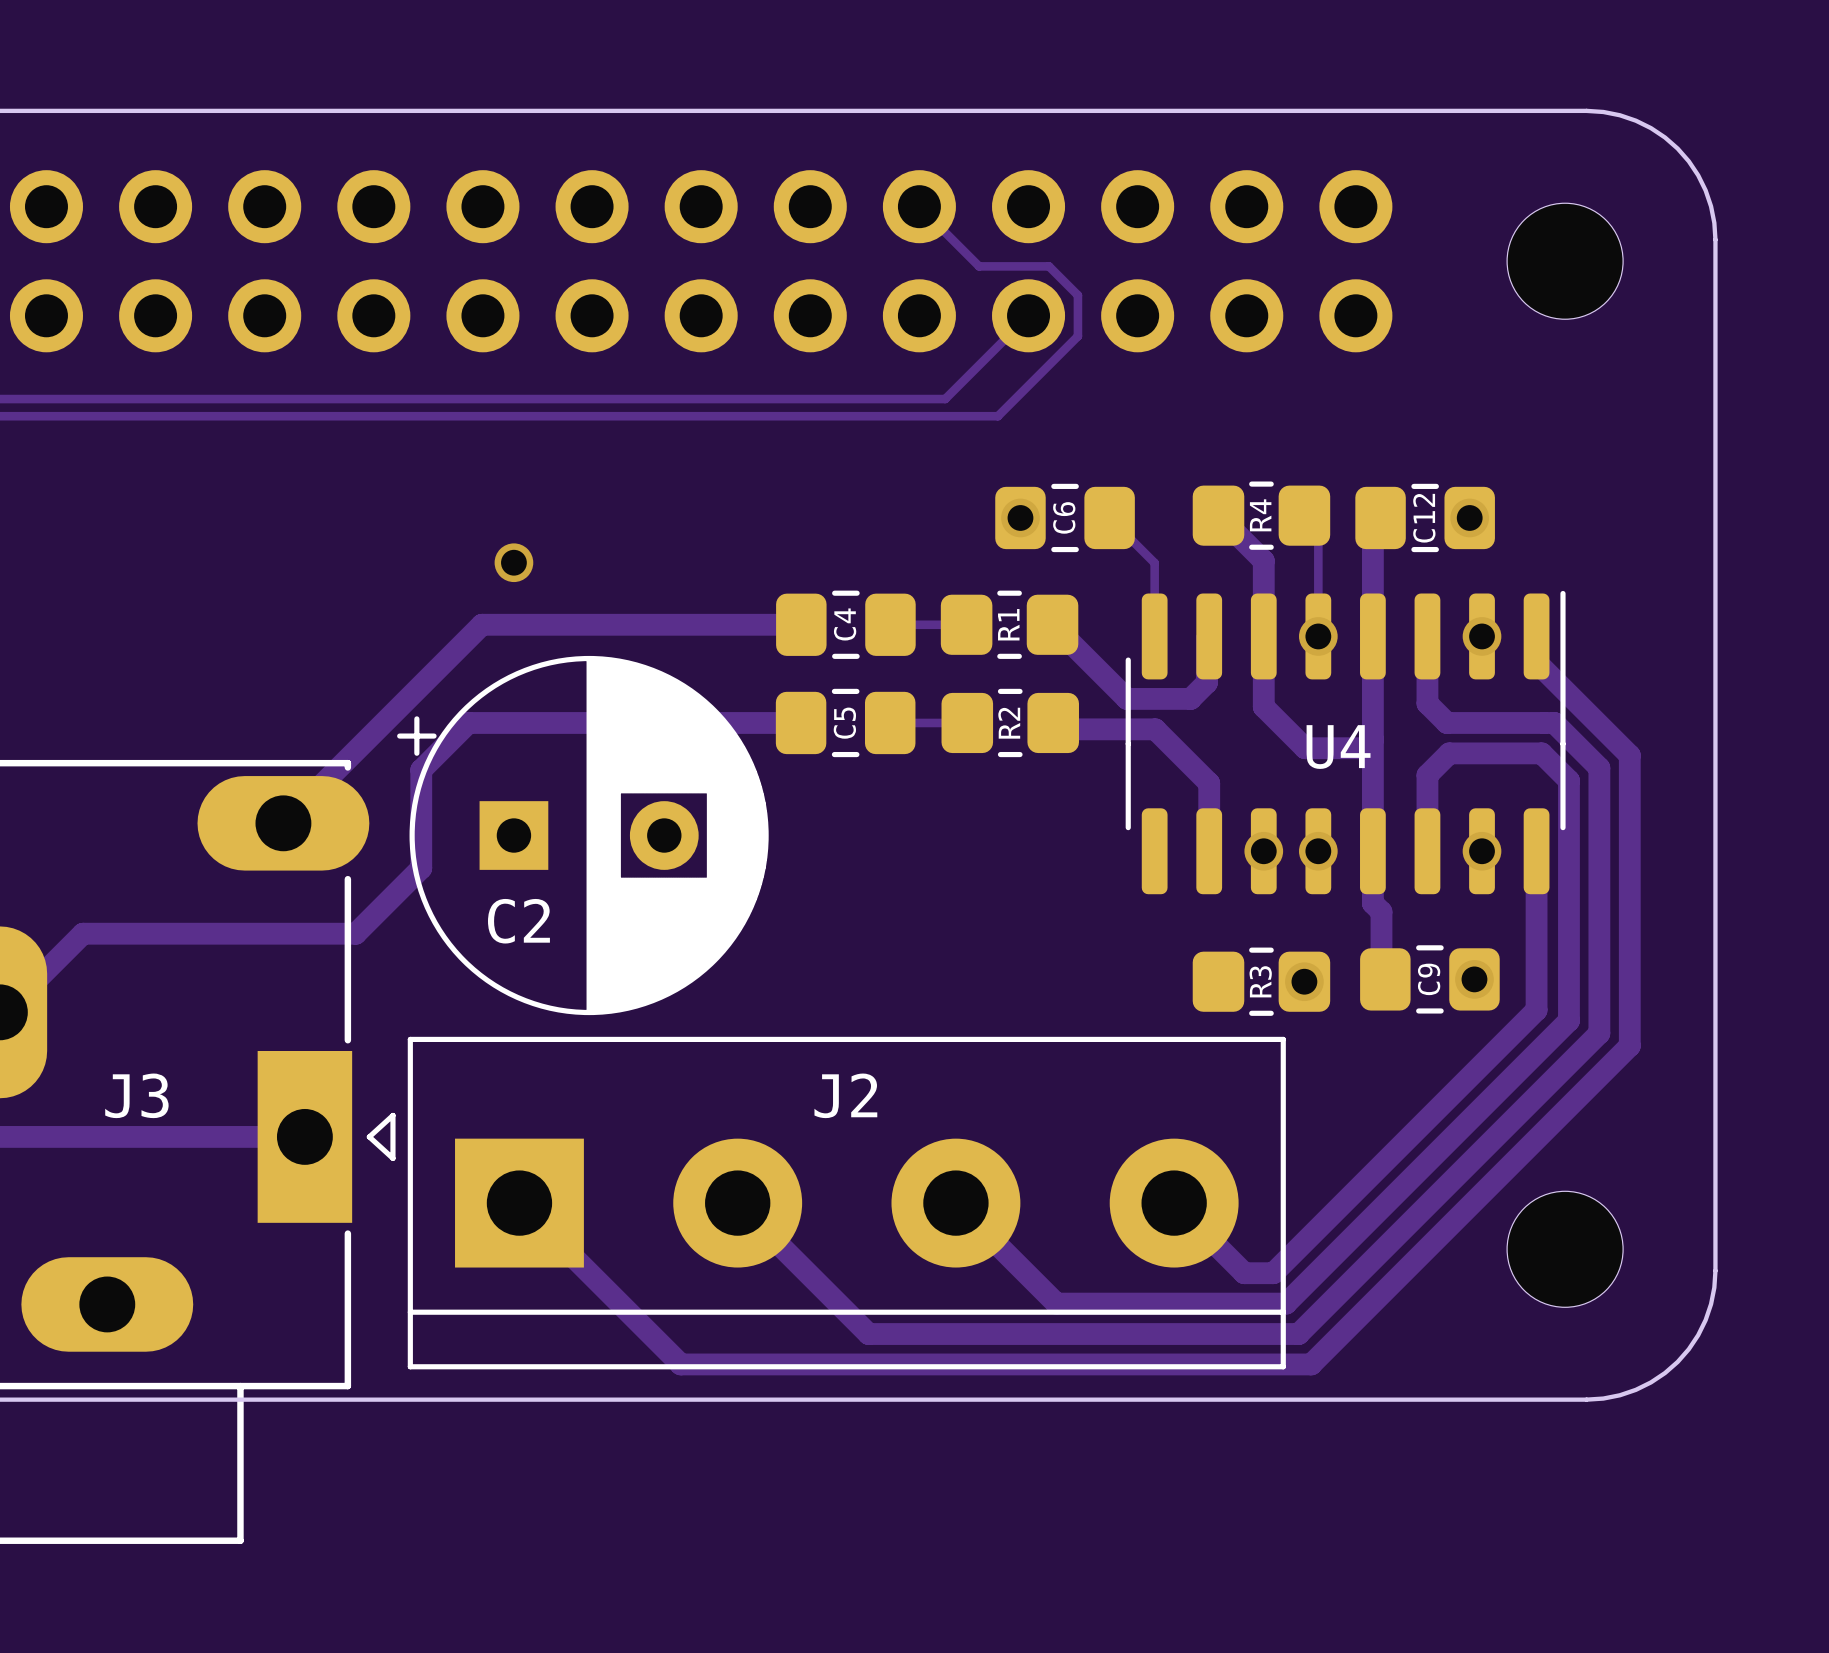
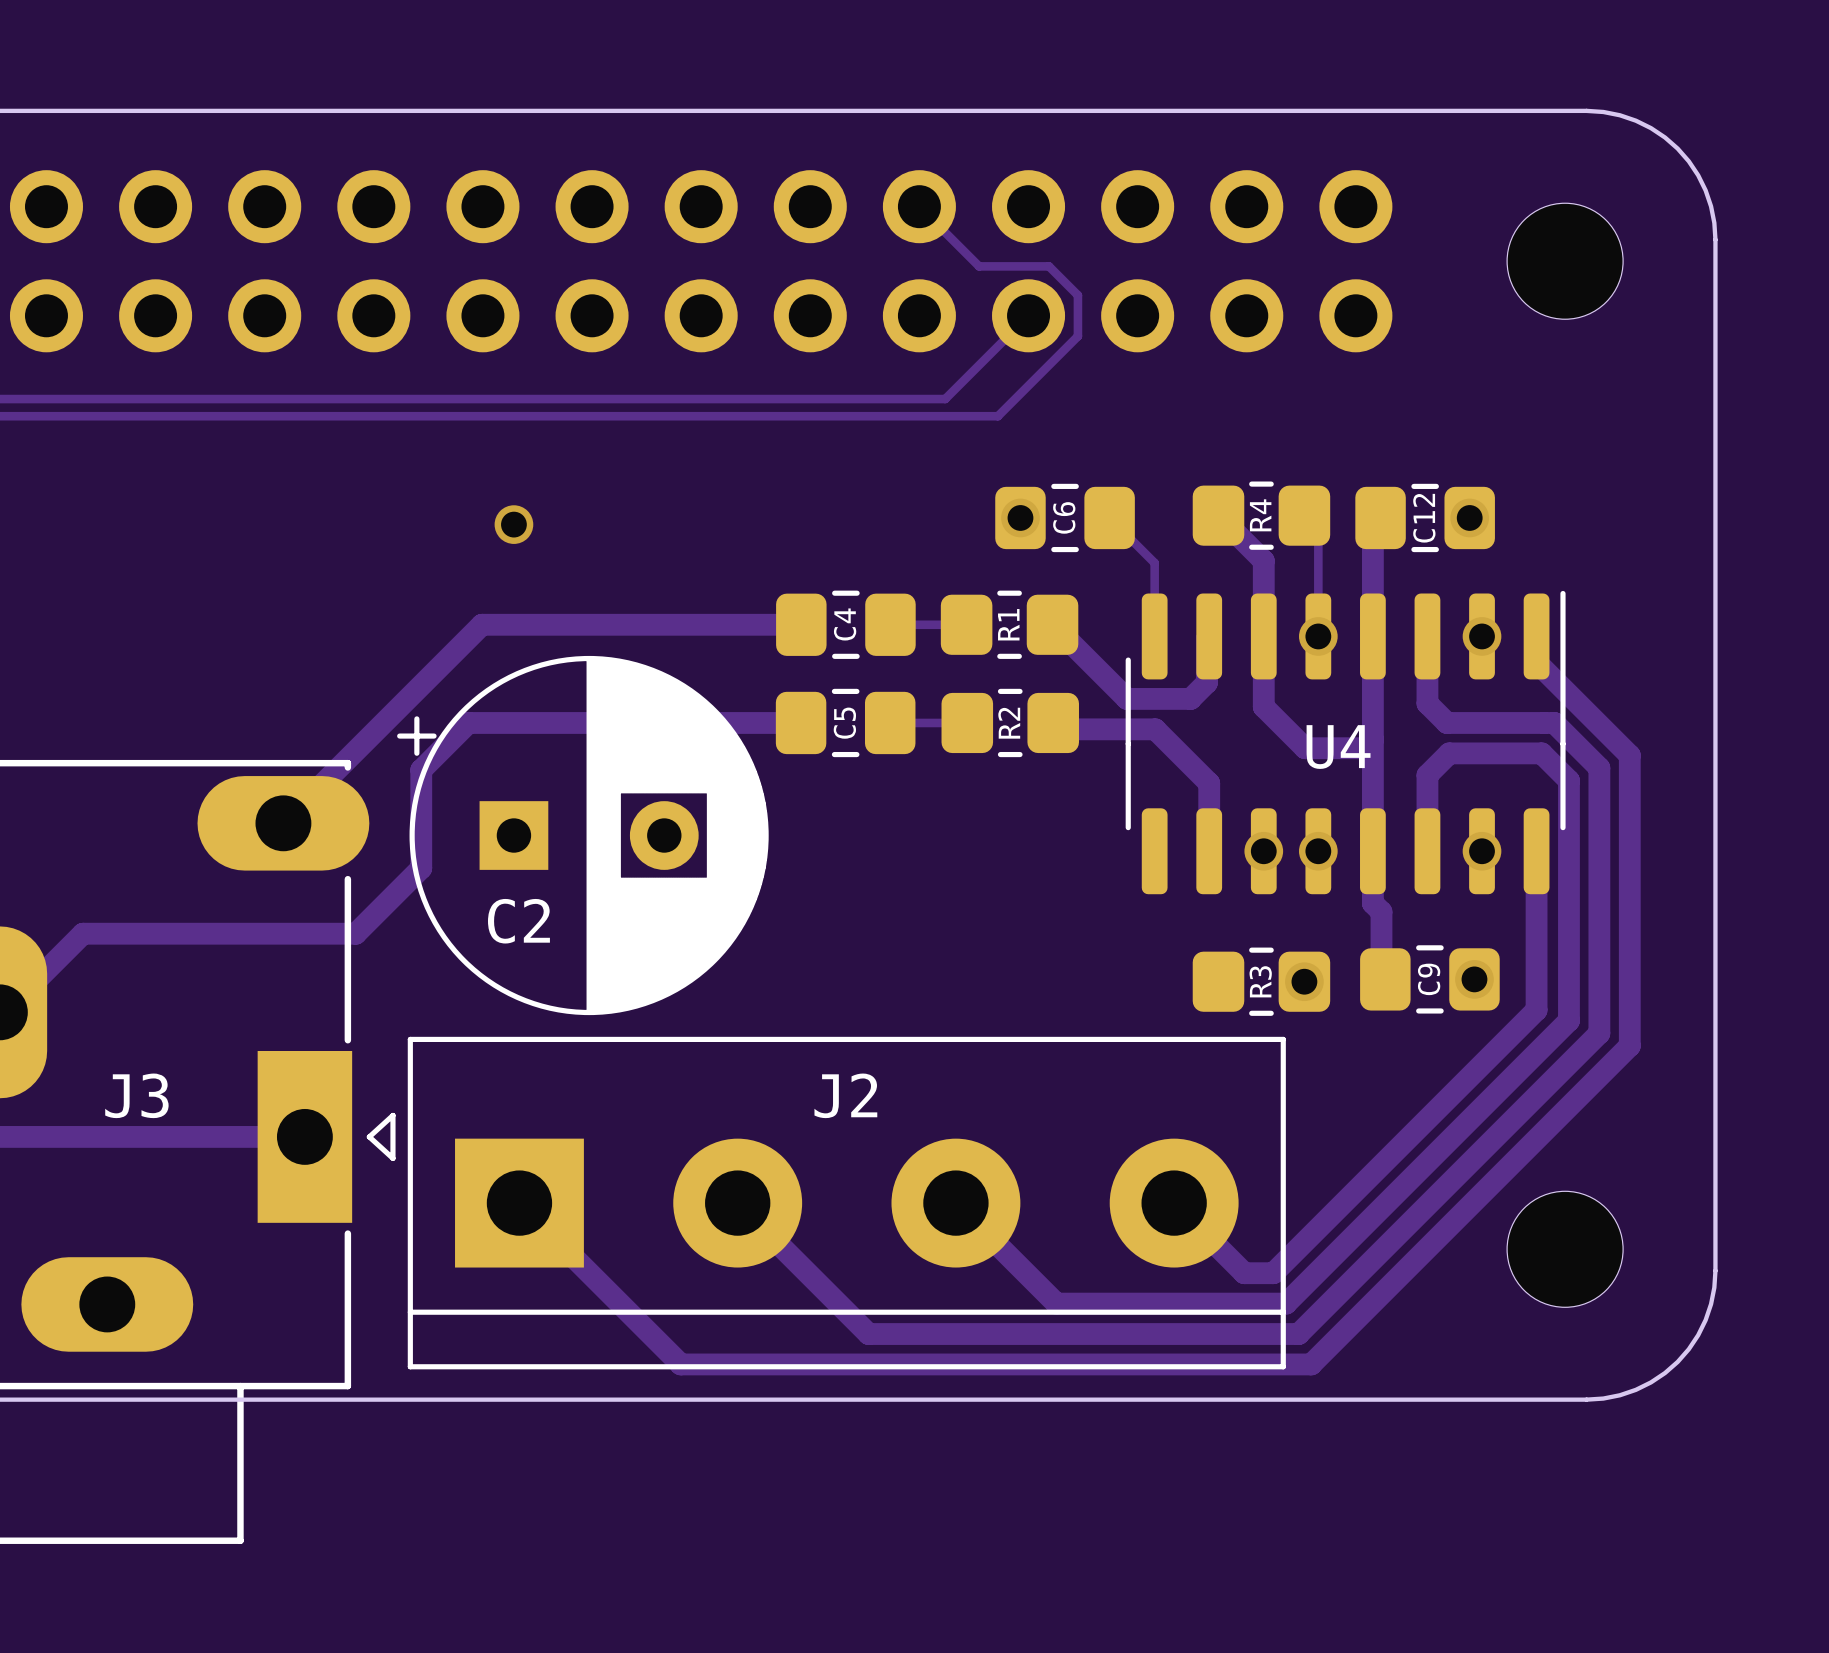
via position: (513, 562) -> (513, 524)

